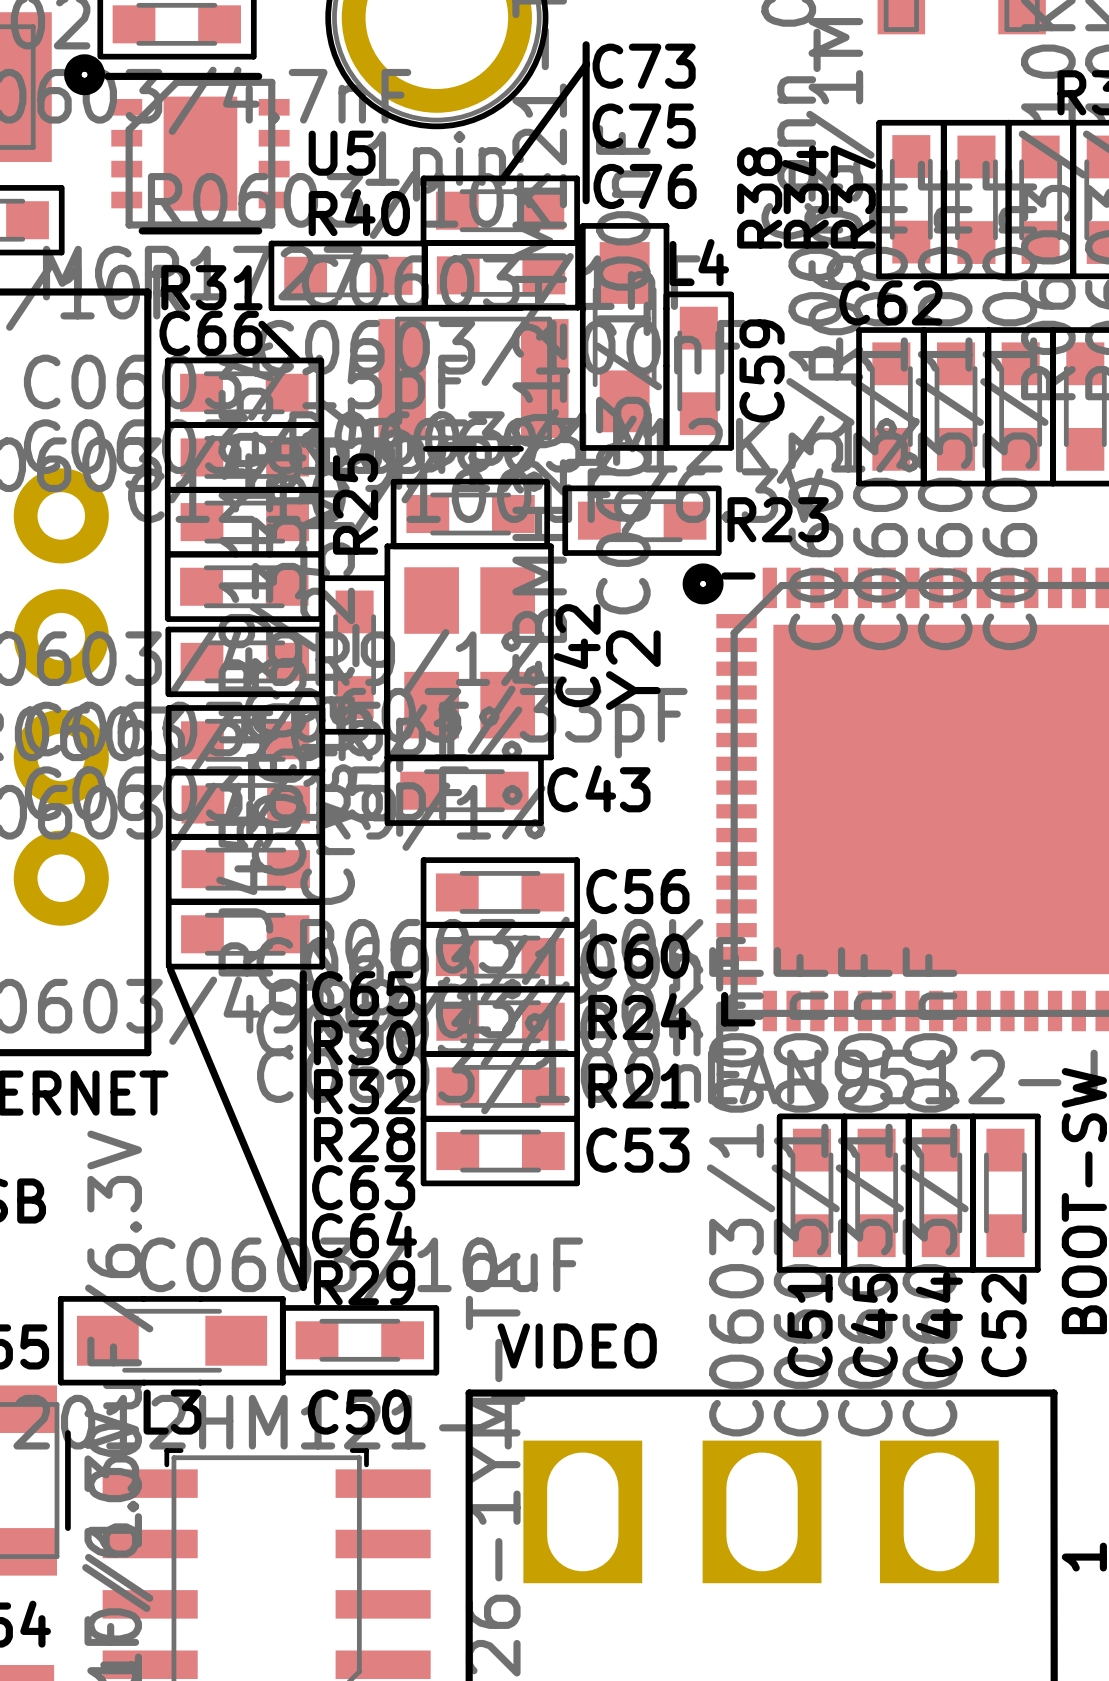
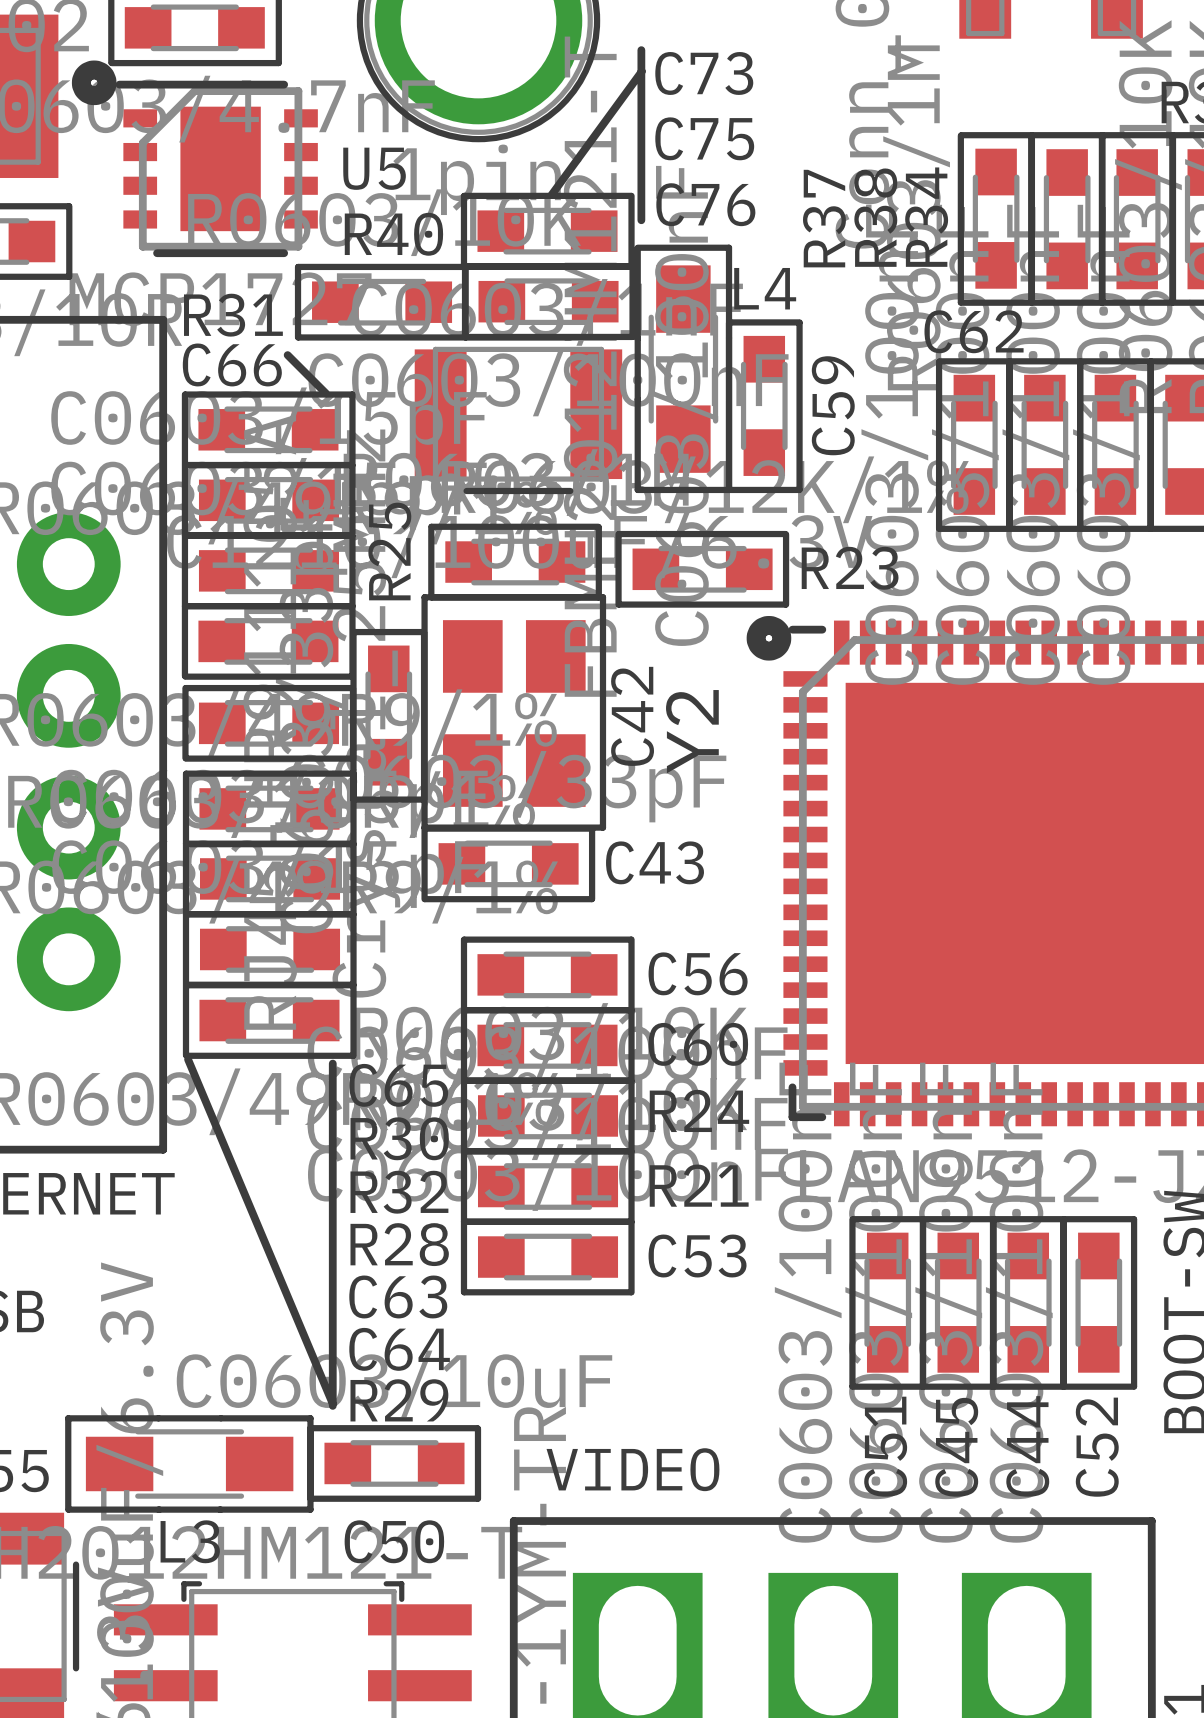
R38 name position: R38 (759, 197) -> R38 (875, 217)
R34 name position: R34 (805, 197) -> R34 (926, 217)
R37 name position: R37 (853, 197) -> R37 (824, 218)

